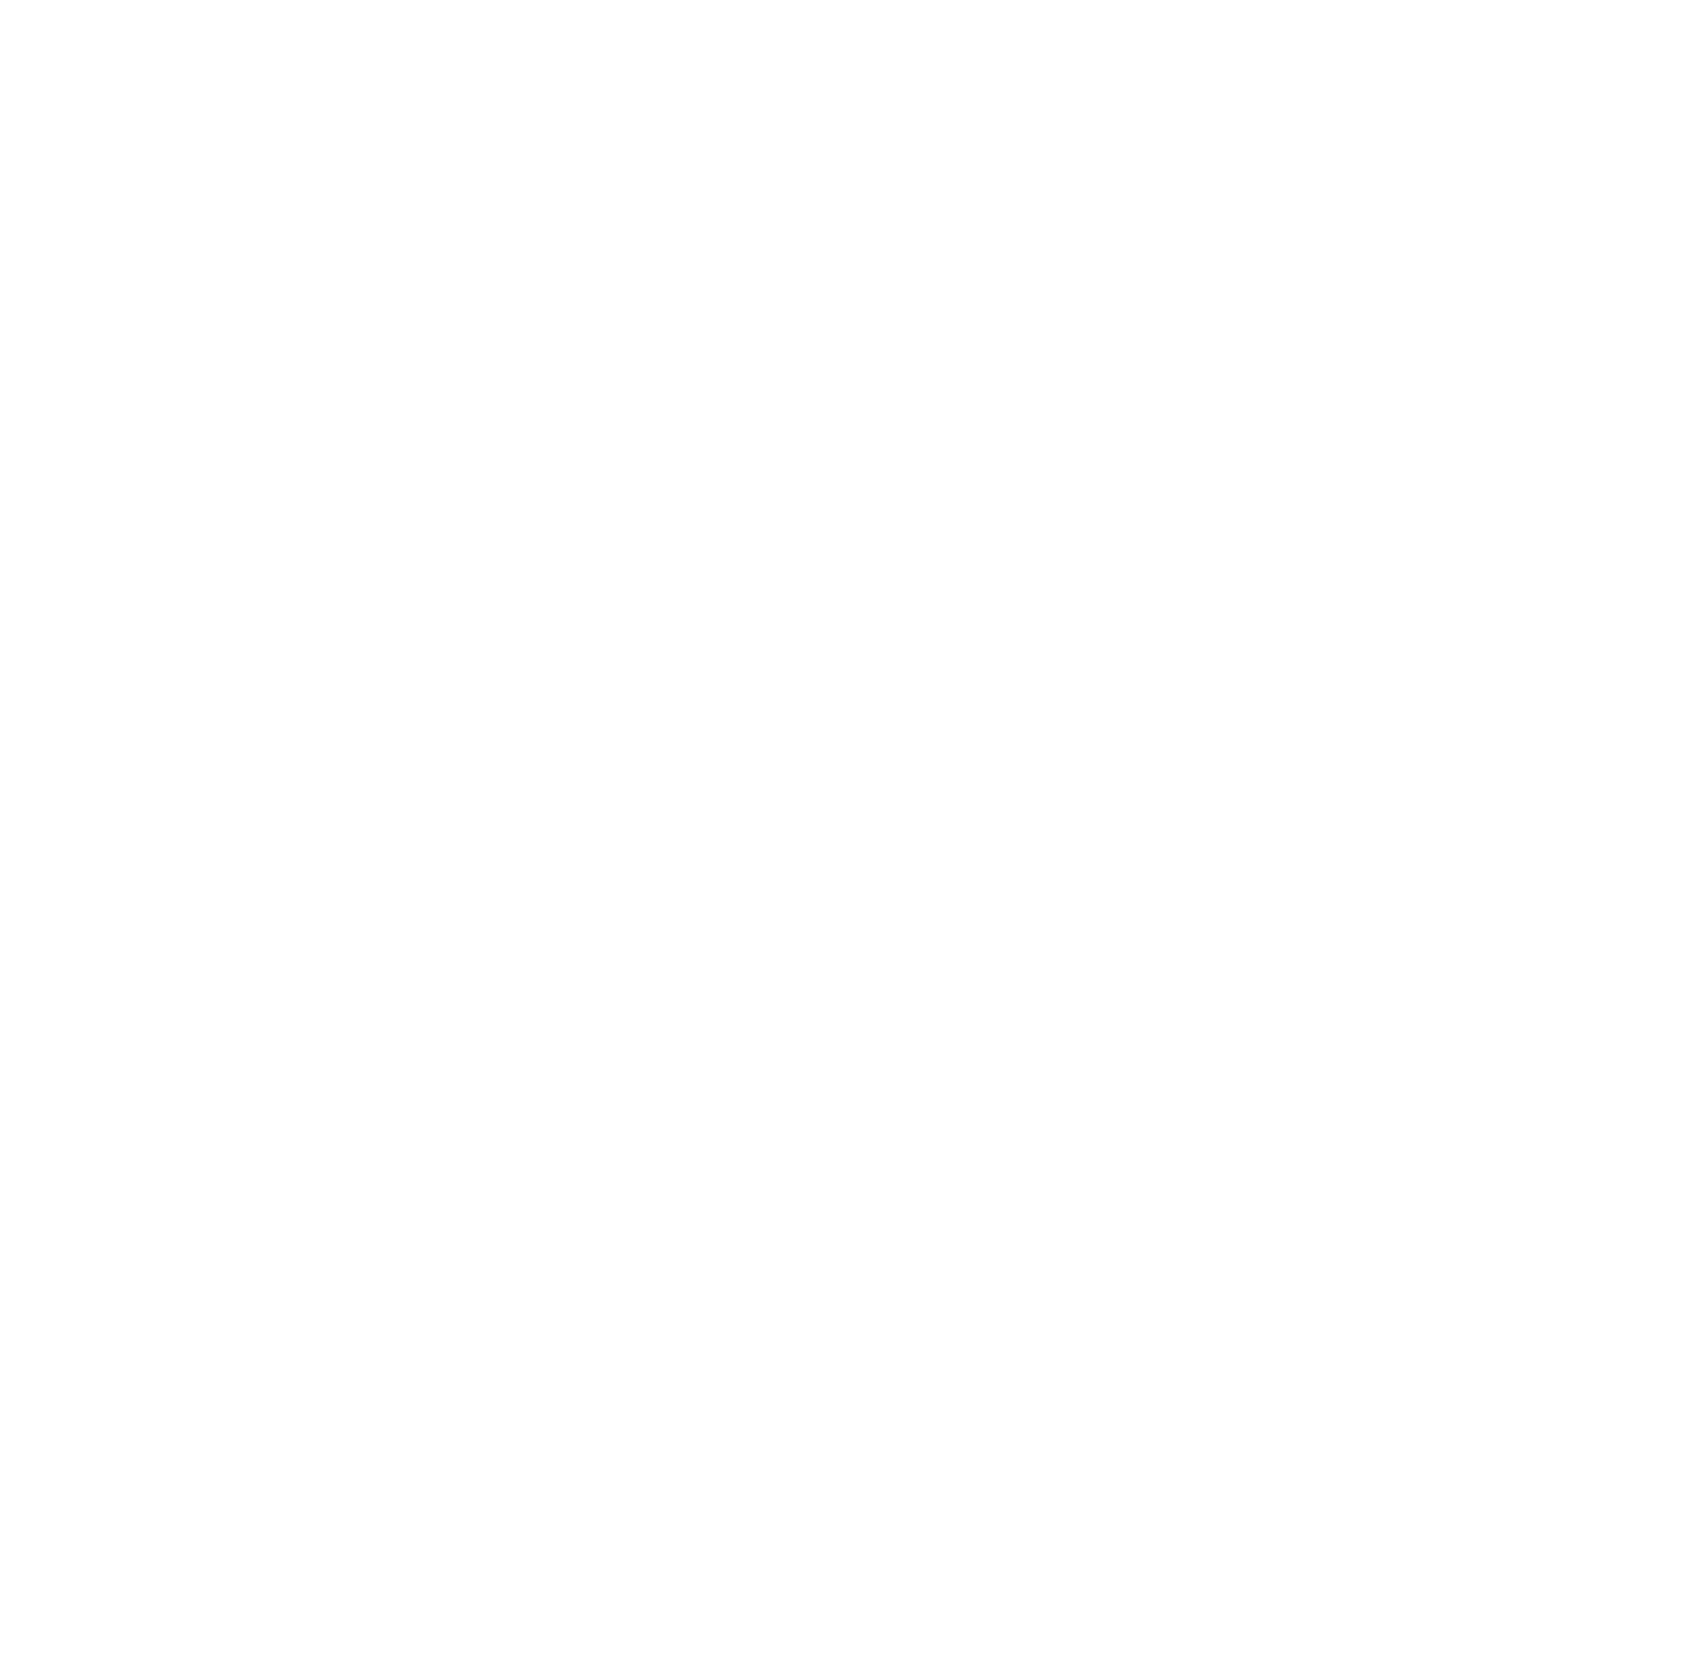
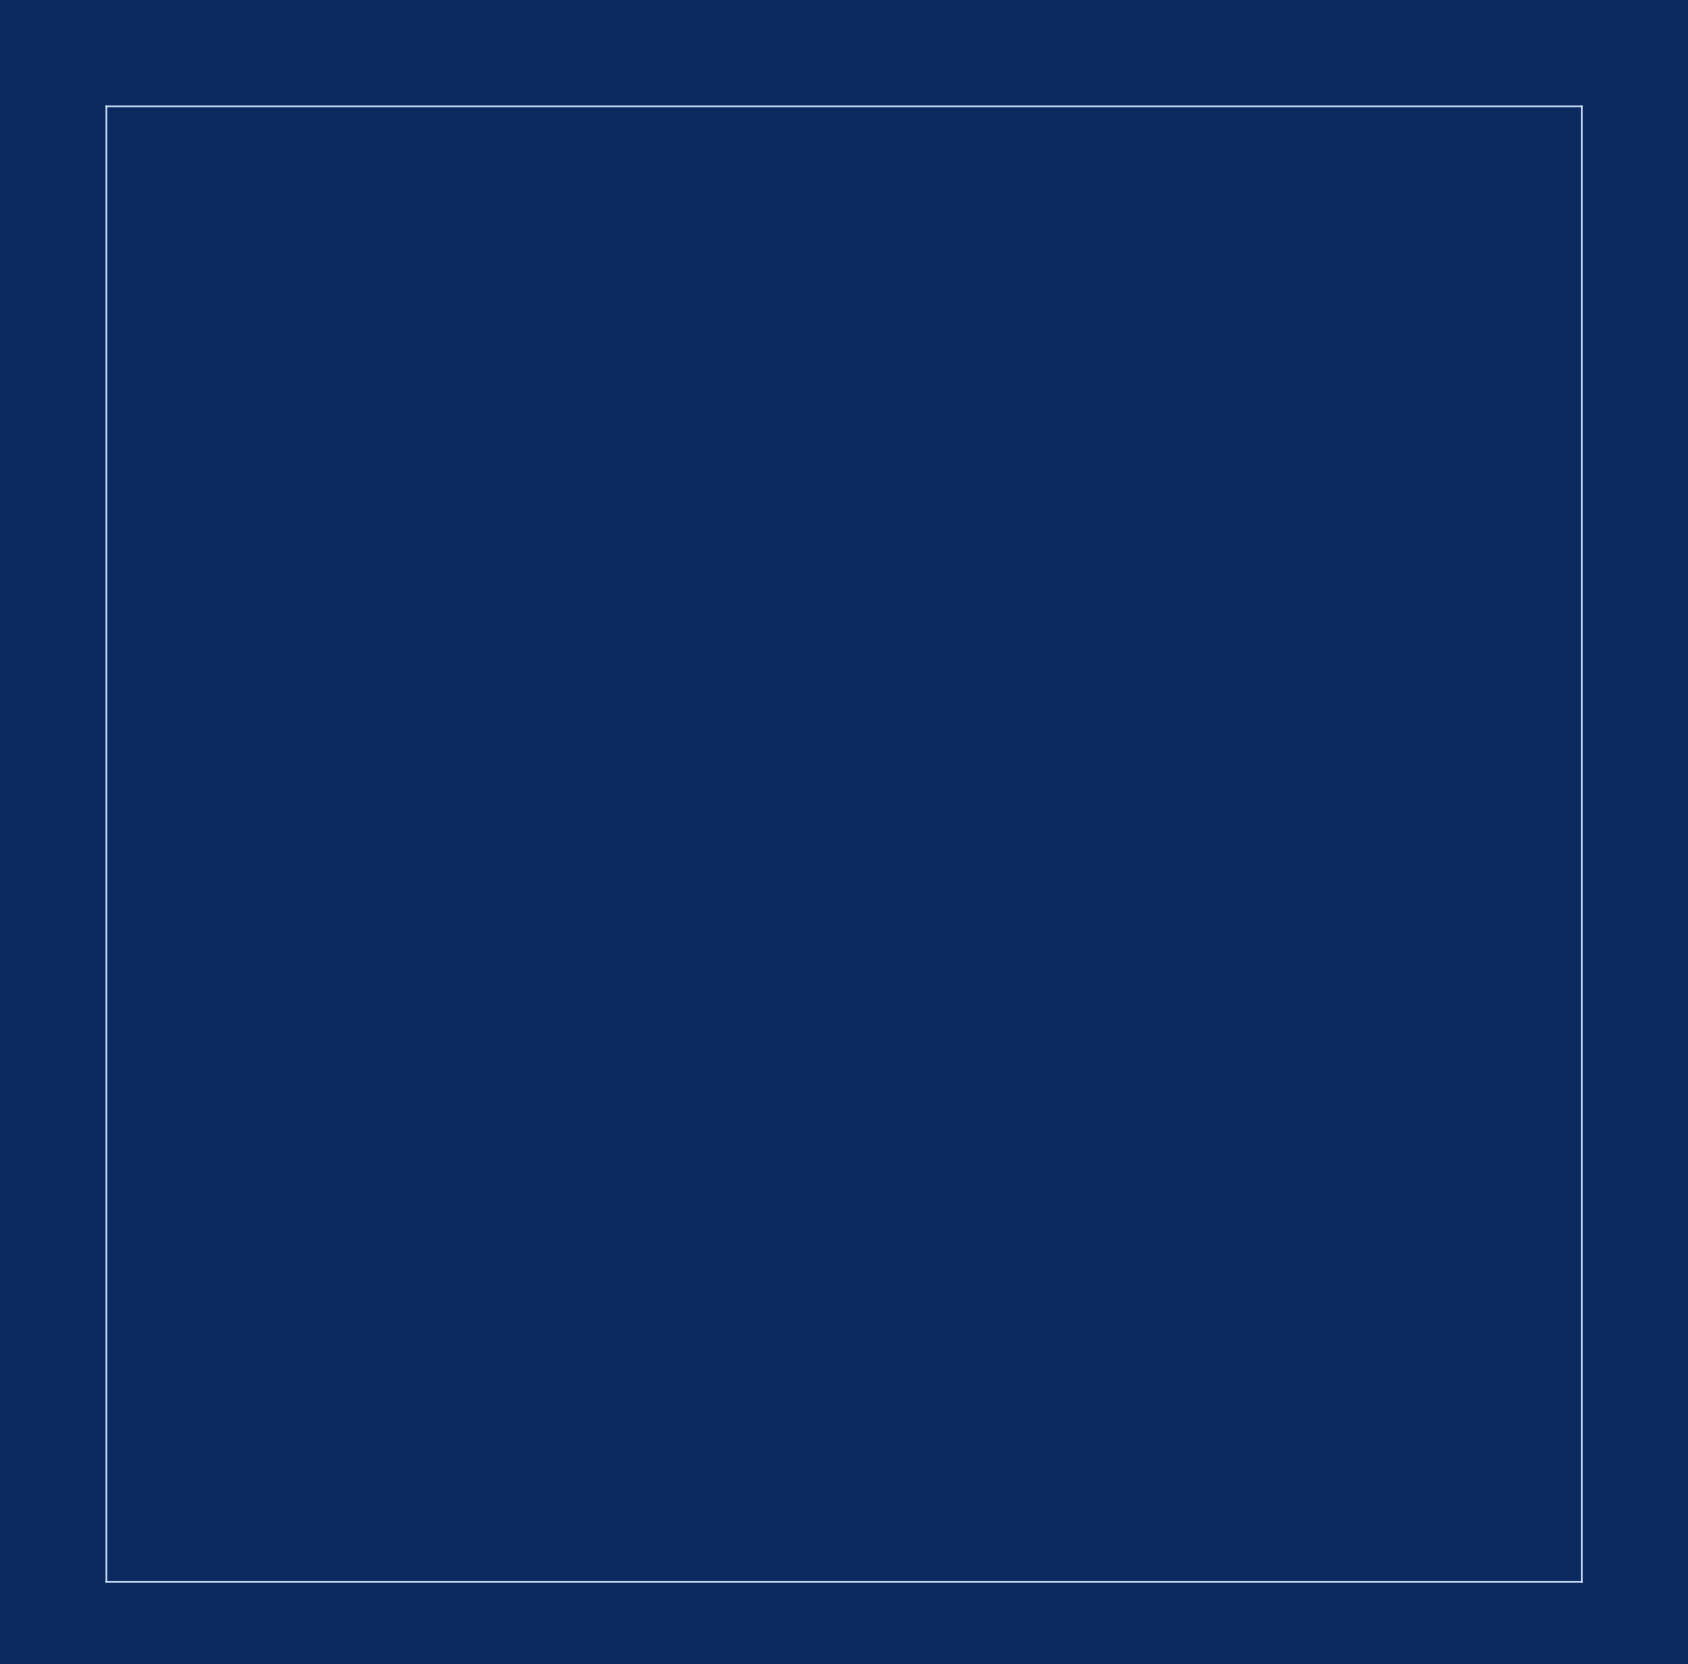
board edge: none -> (1581, 106) (106, 106) (106, 1581) (1581, 1581) (1581, 106)

